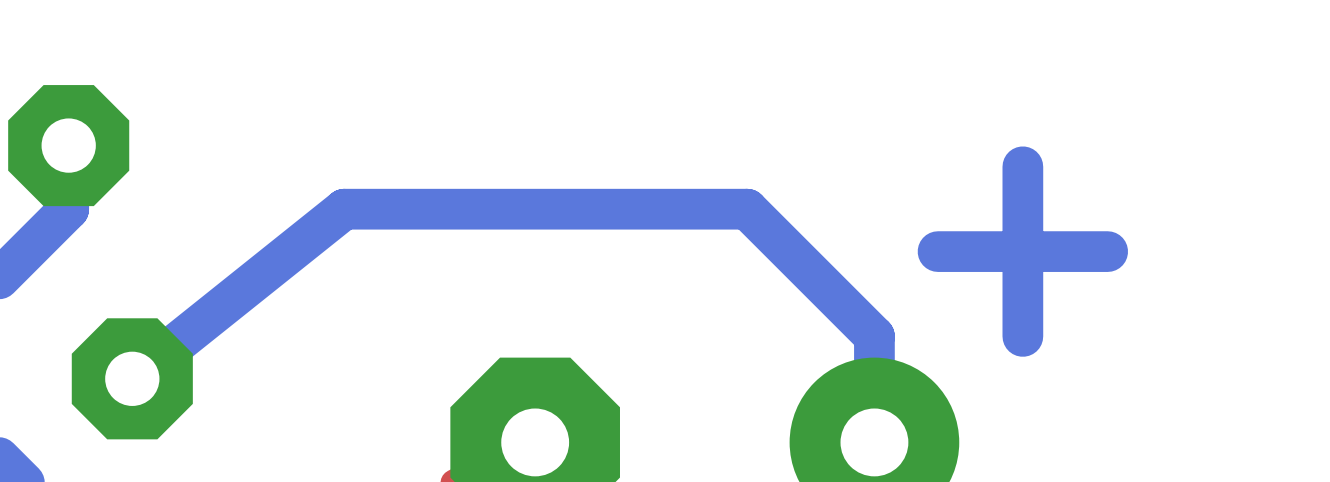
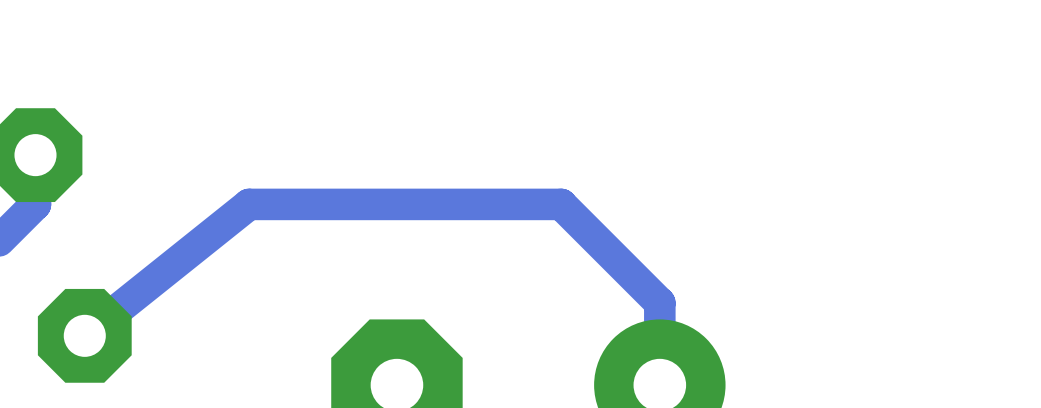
bottom track: (1022, 166) (1022, 336) -> none
bottom track: (1107, 251) (938, 251) -> none

